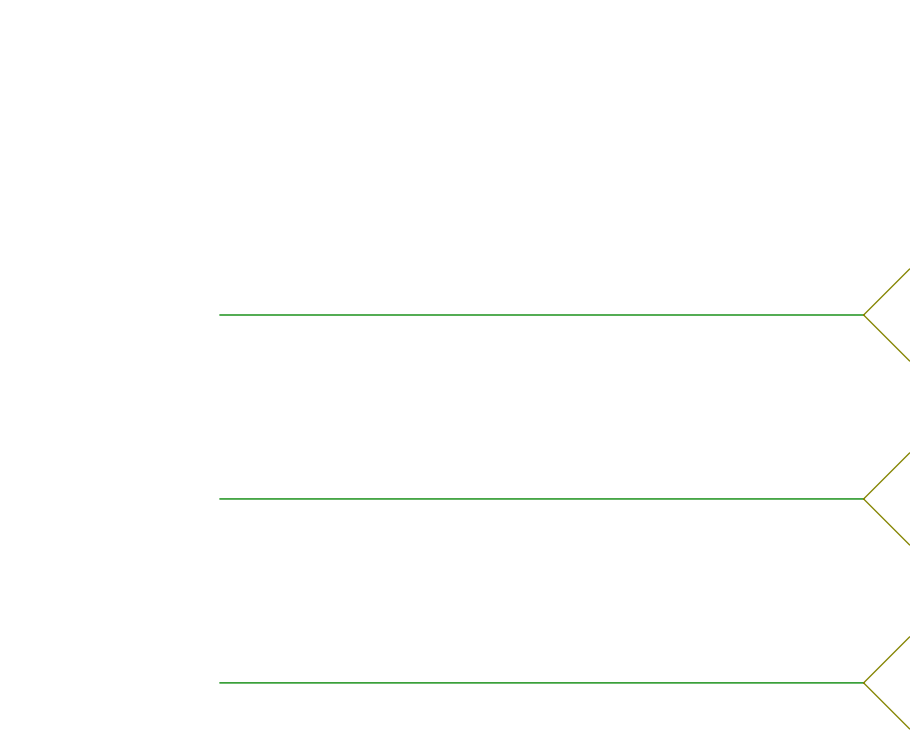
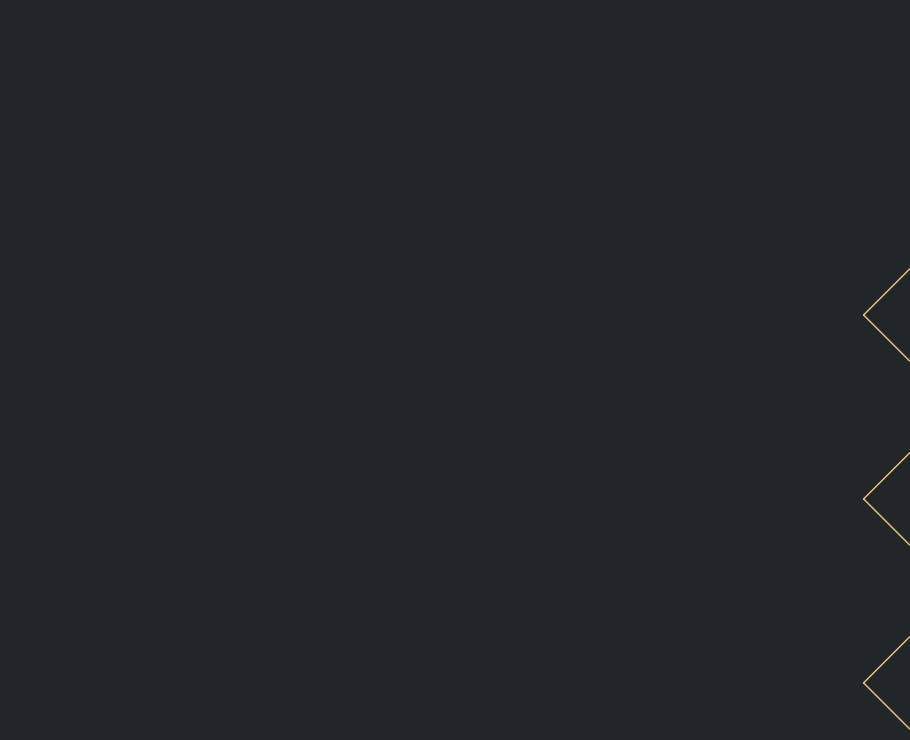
wire: (219, 314) (863, 314) -> none
wire: (219, 498) (863, 498) -> none
wire: (219, 682) (863, 682) -> none

